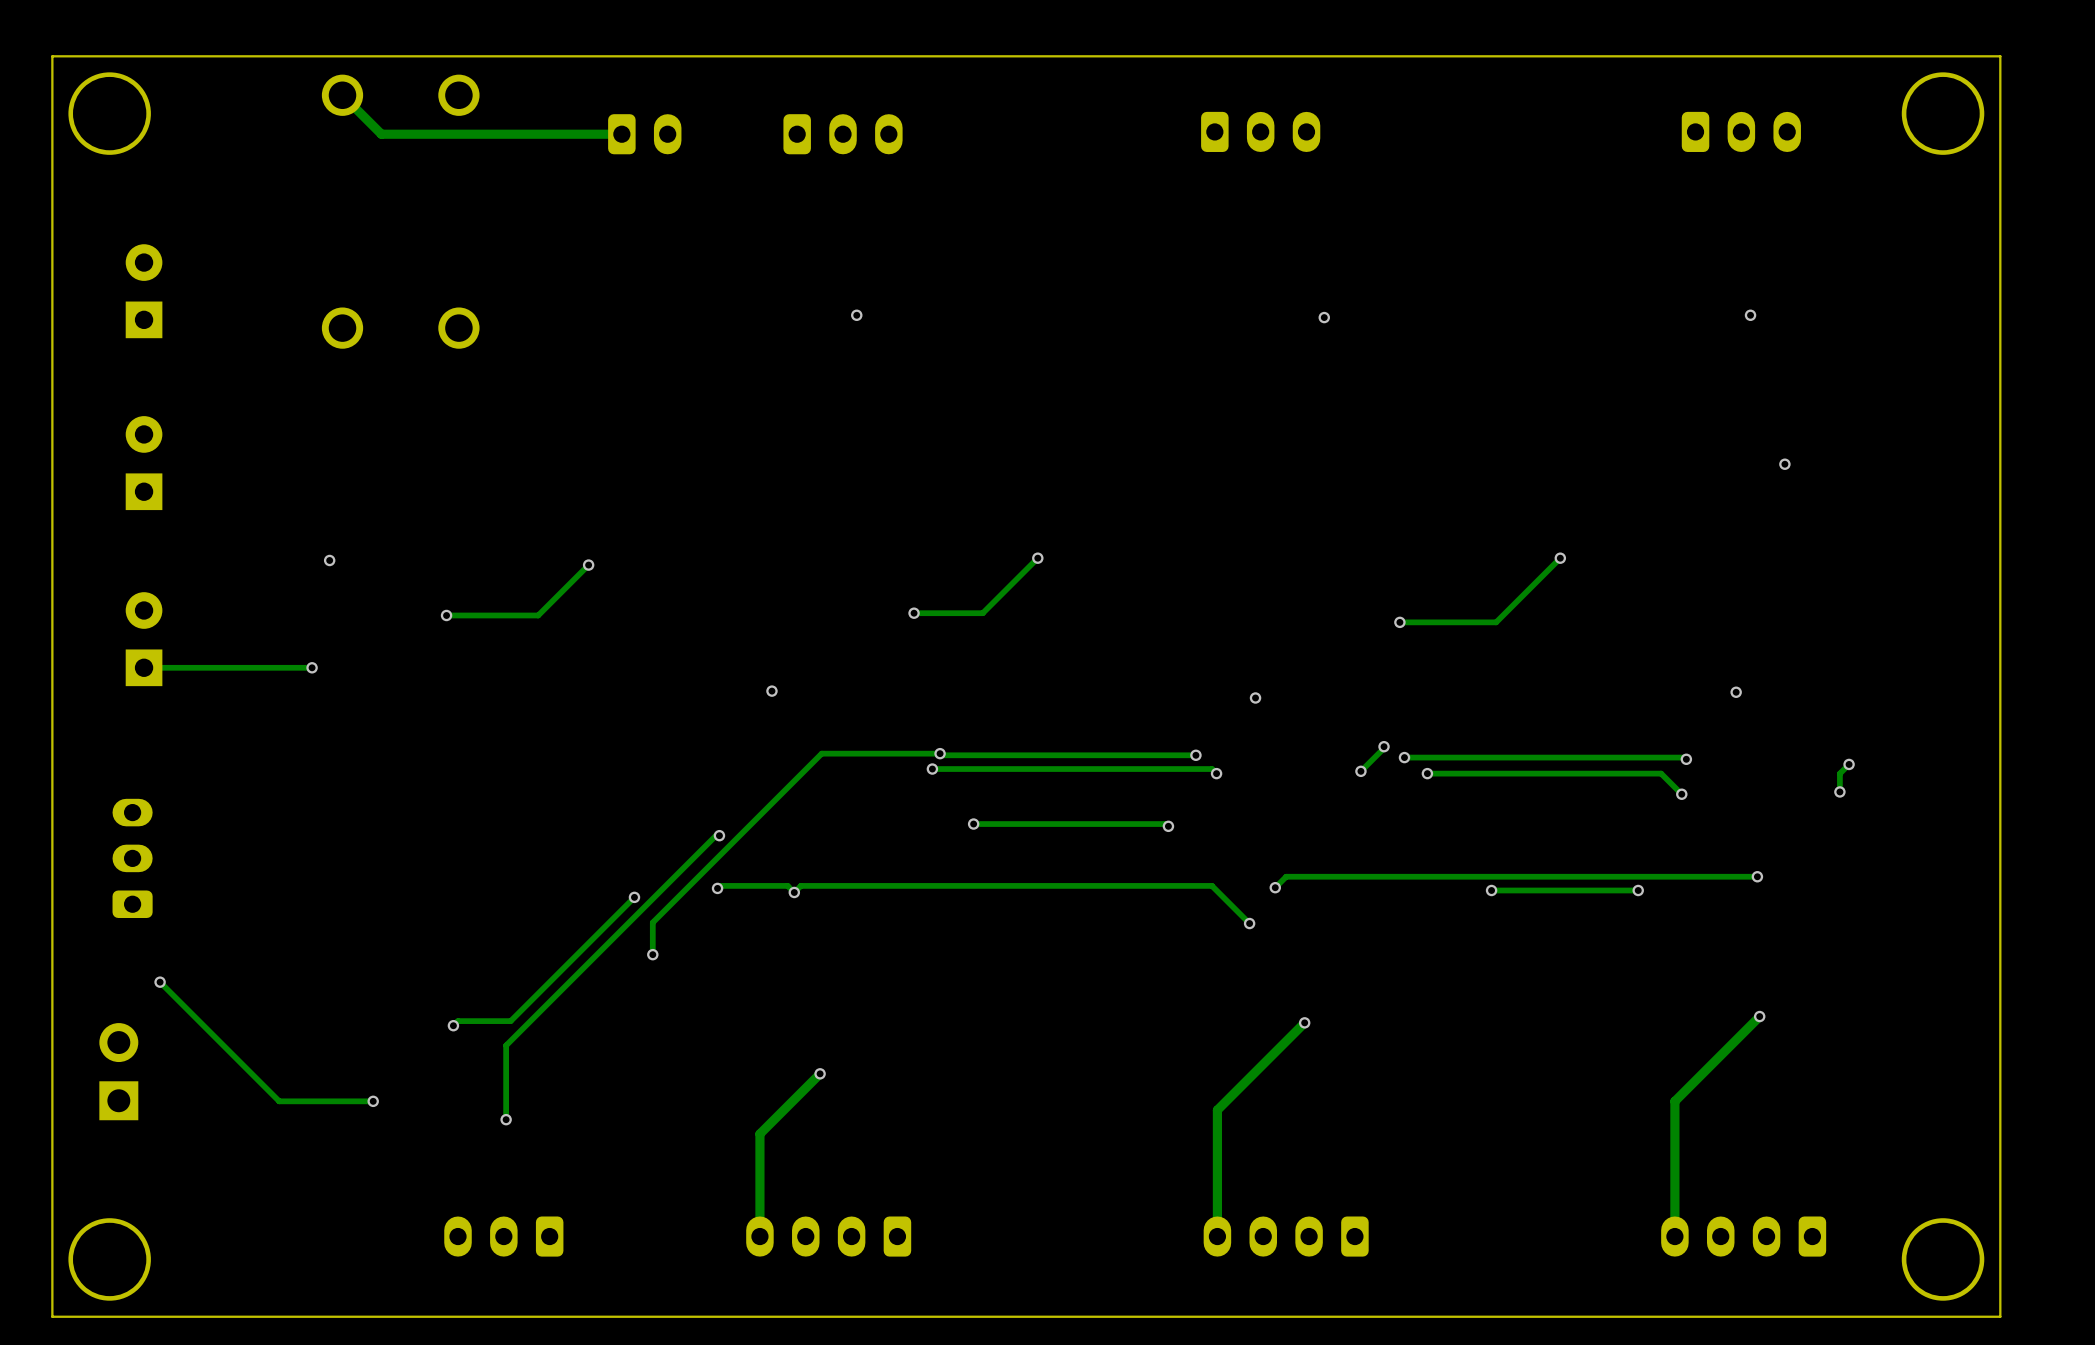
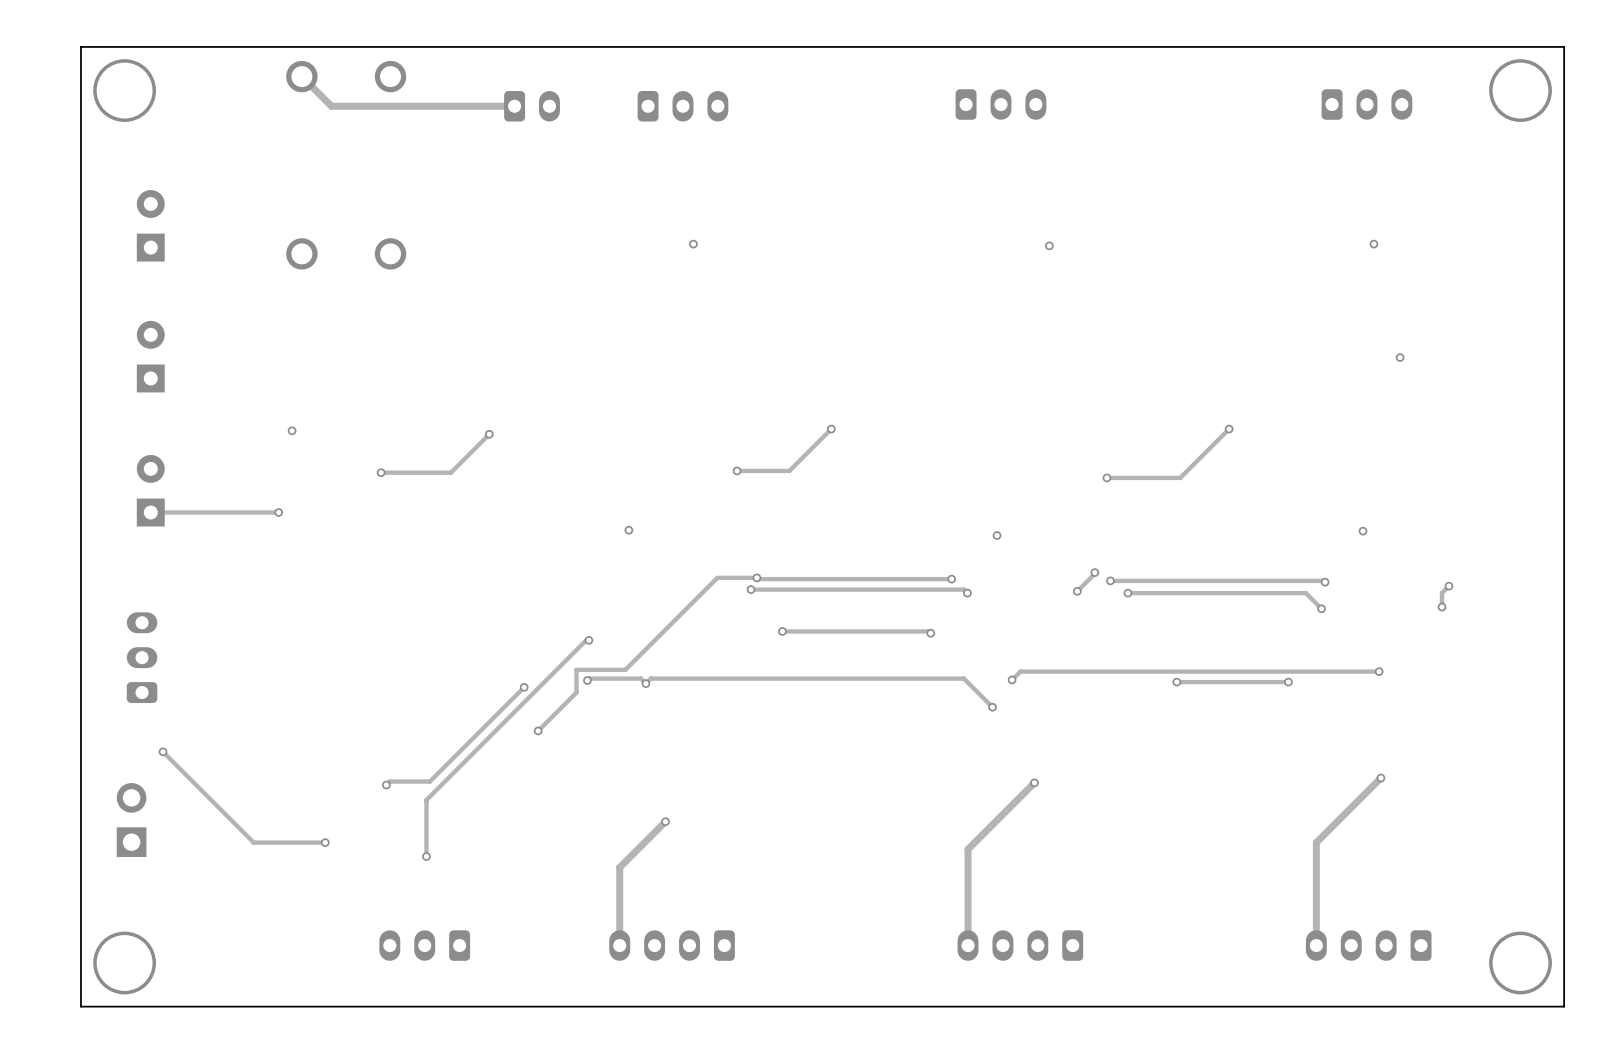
track: (888, 753) (821, 753) (652, 922) (652, 954) -> (717, 577) (625, 669) (576, 669) (576, 692) (538, 730)

